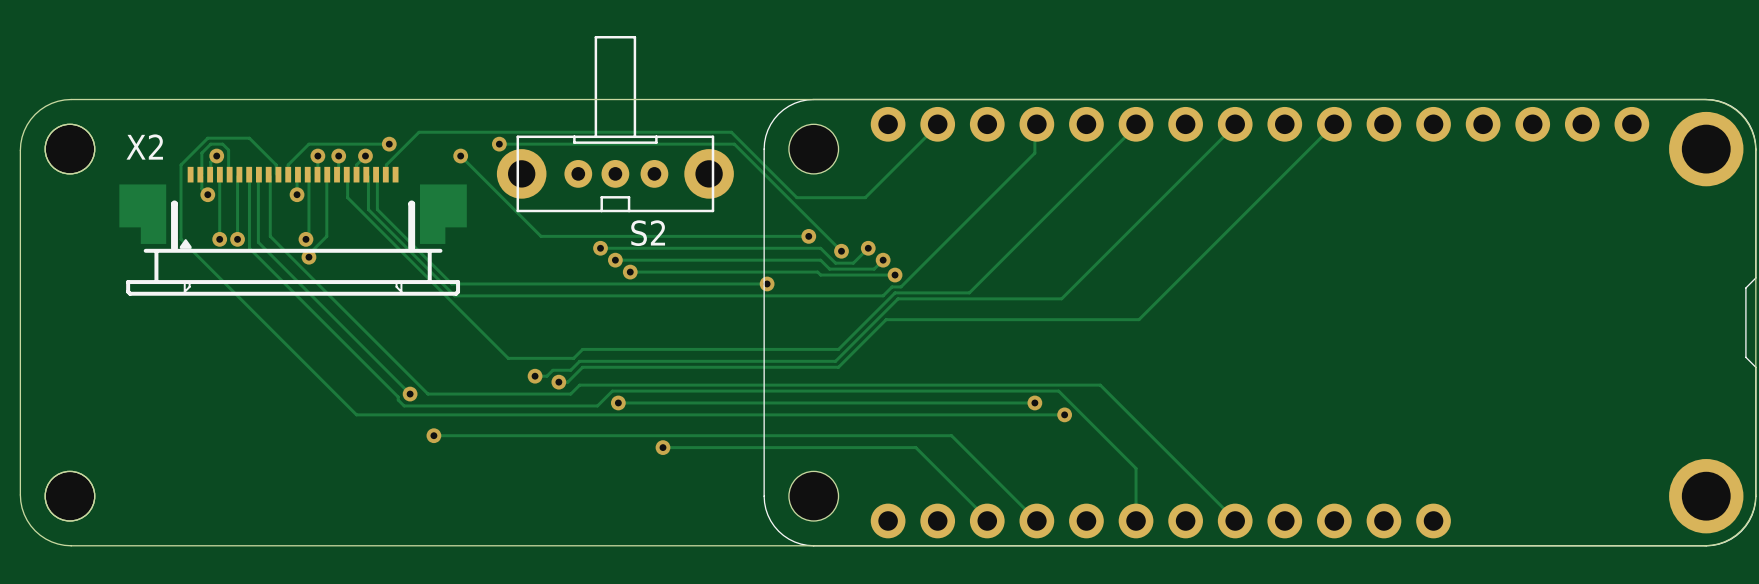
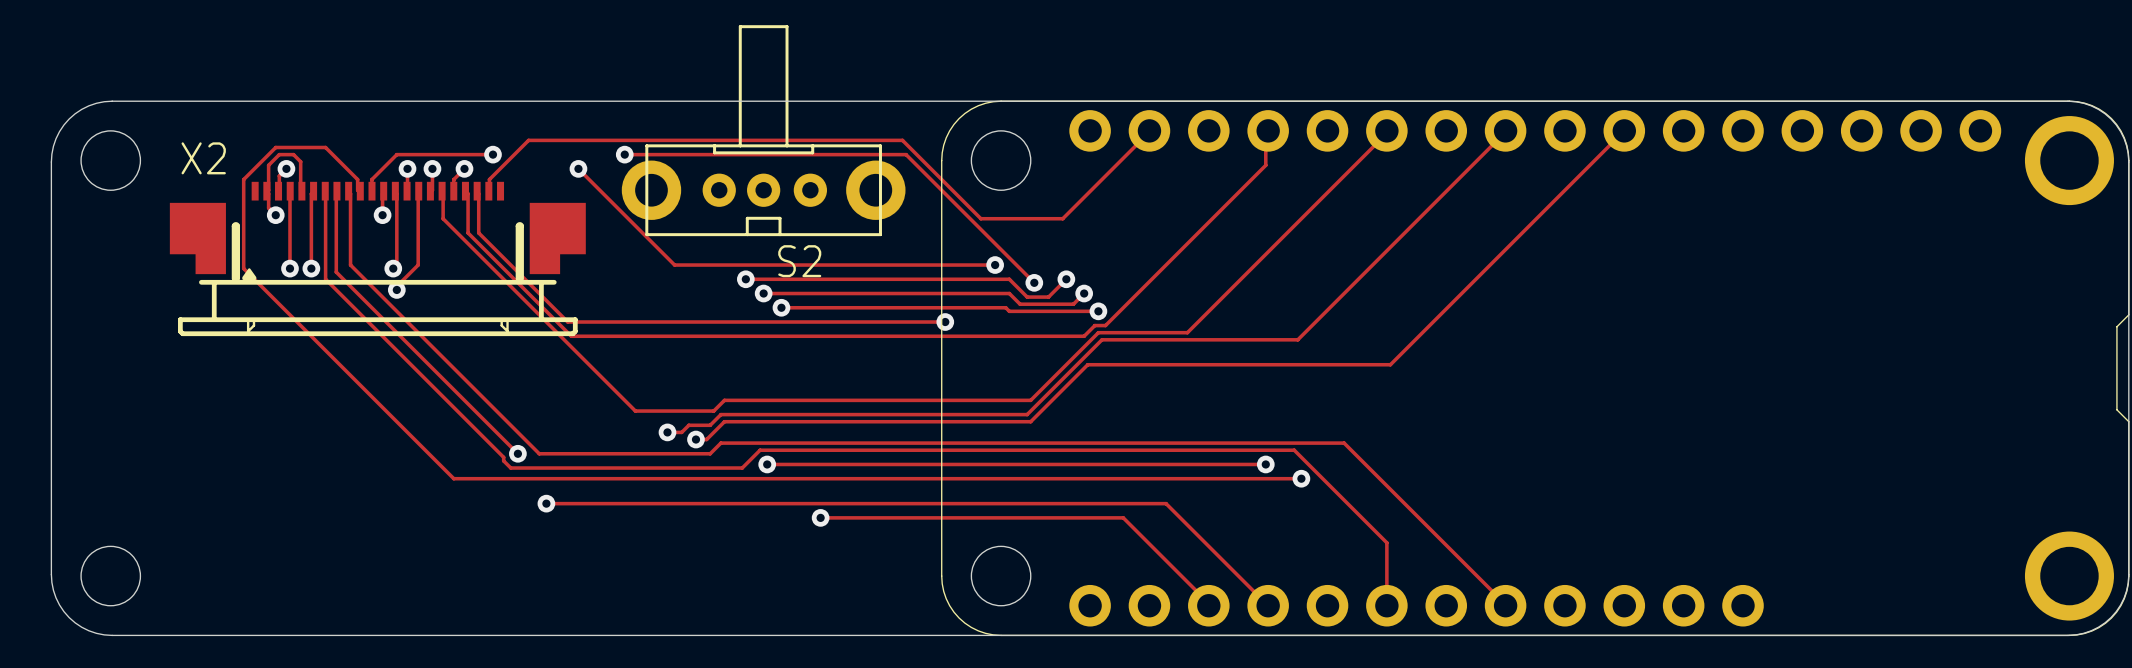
hole: (69, 149) -> none
hole: (69, 496) -> none

